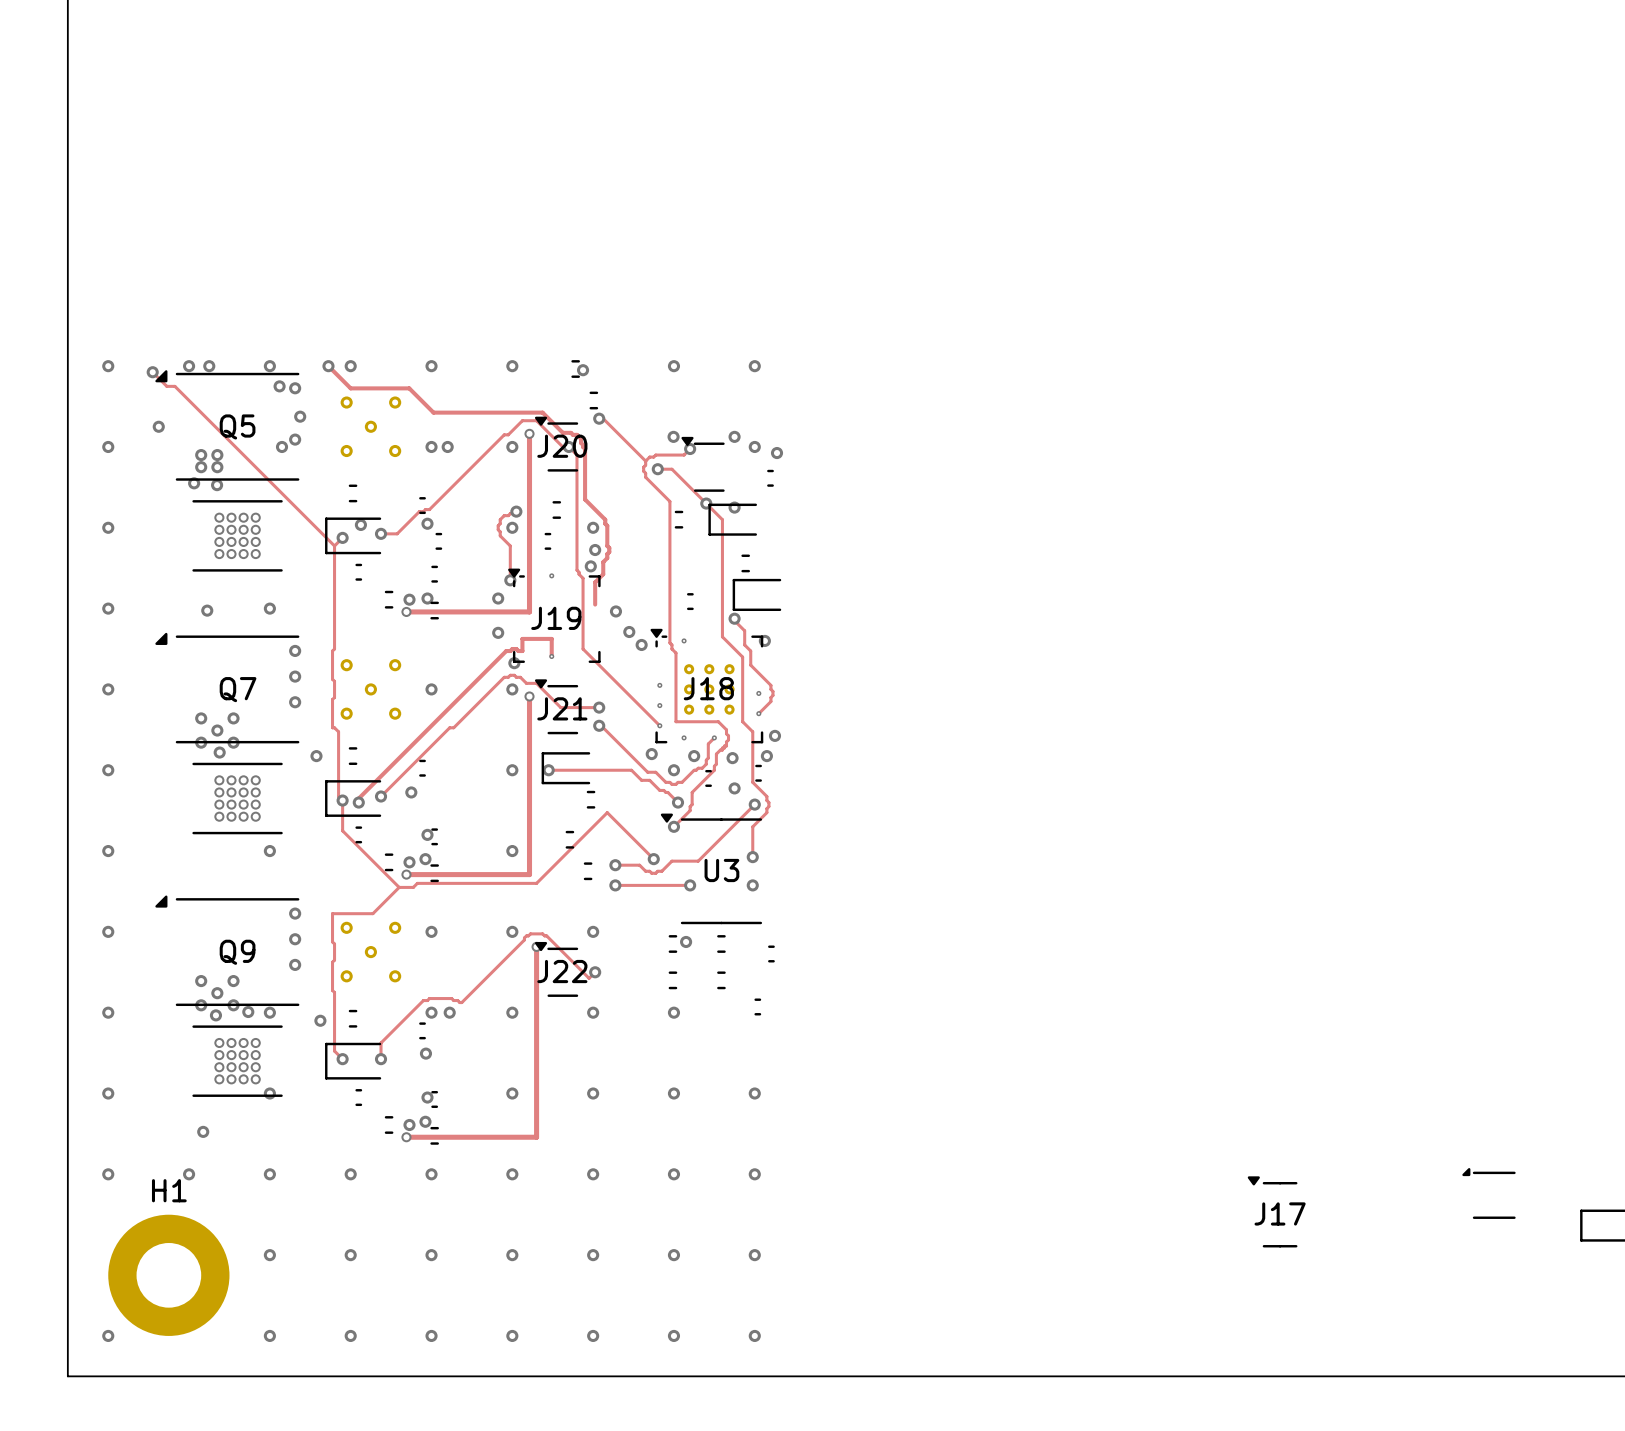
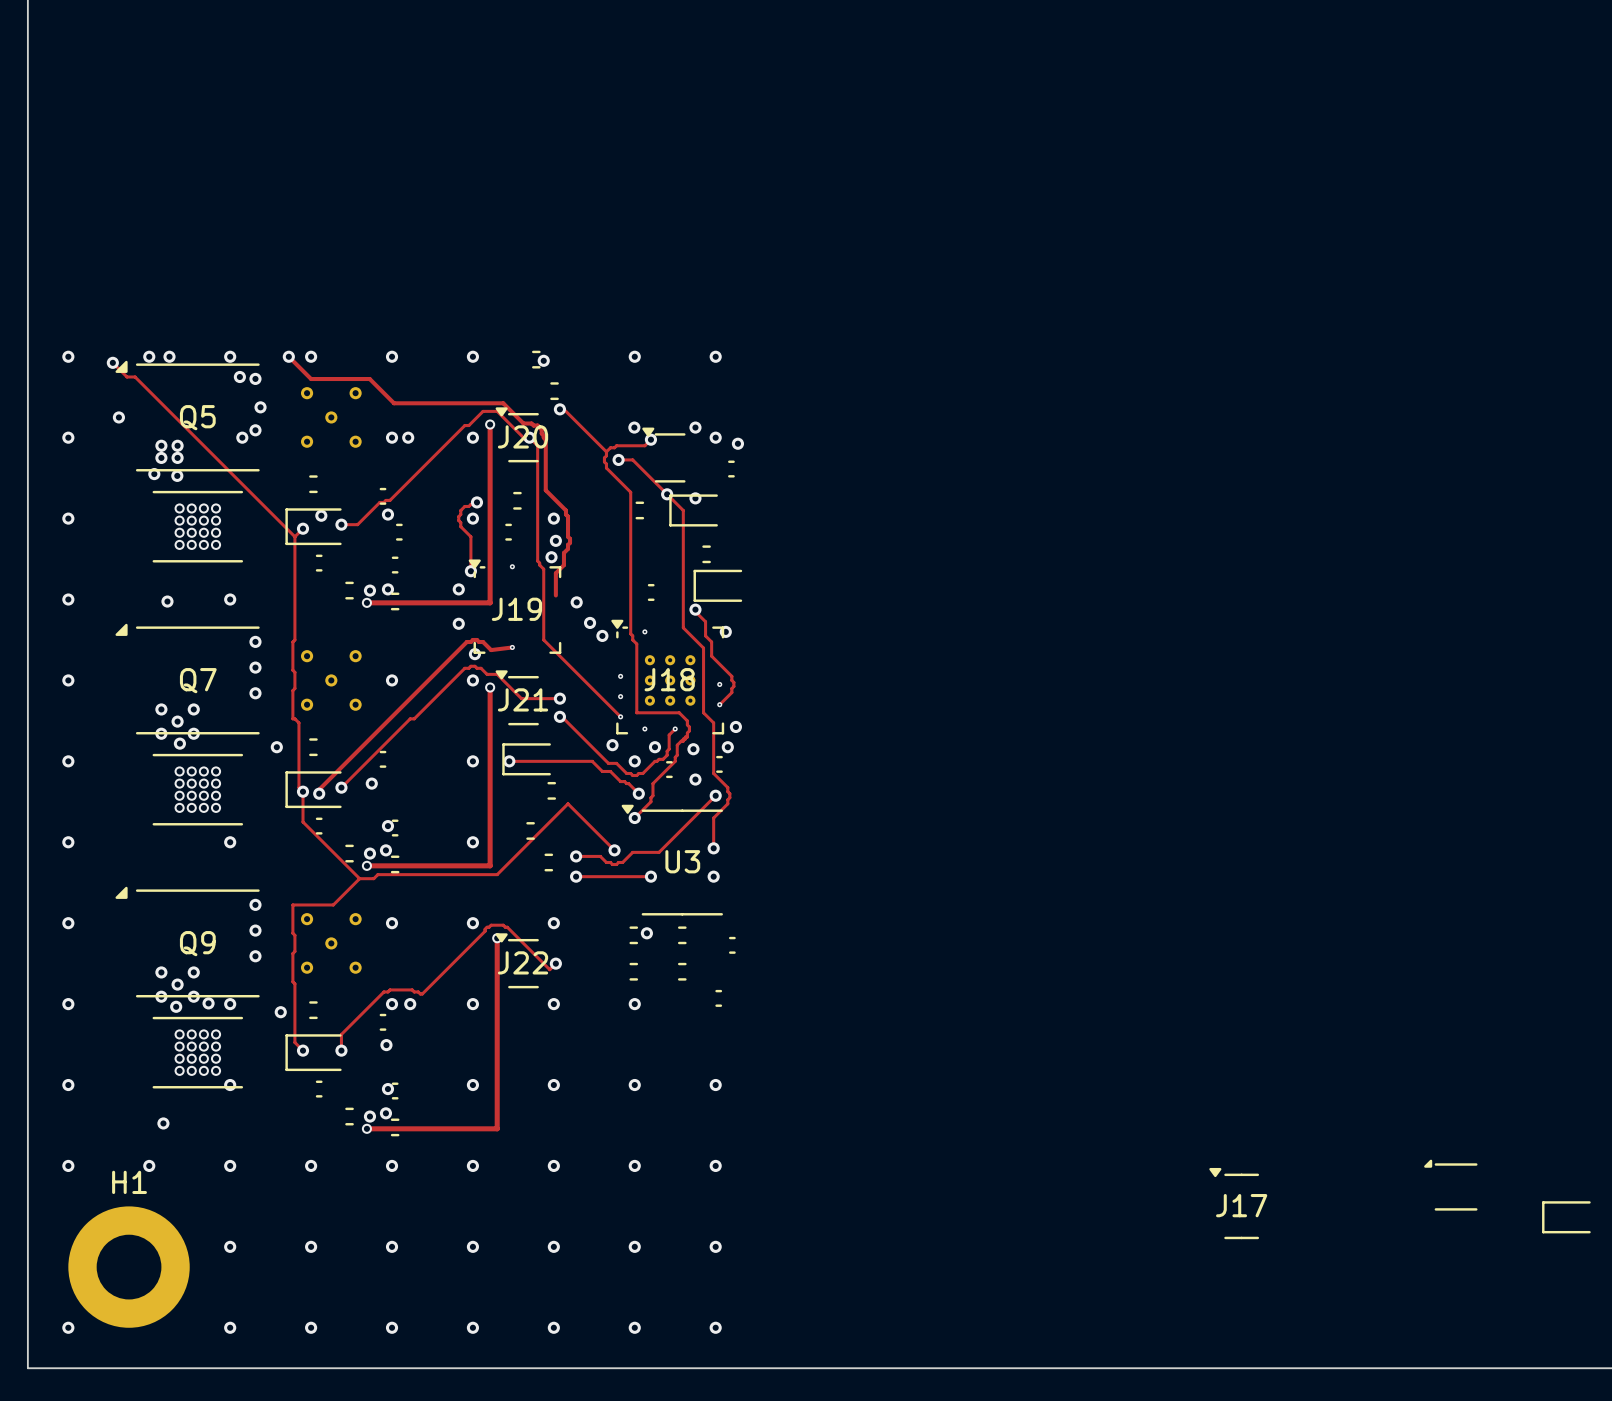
track: (522, 651) (522, 638) (551, 638) (551, 656) -> (483, 642) (491, 650) (512, 647)

